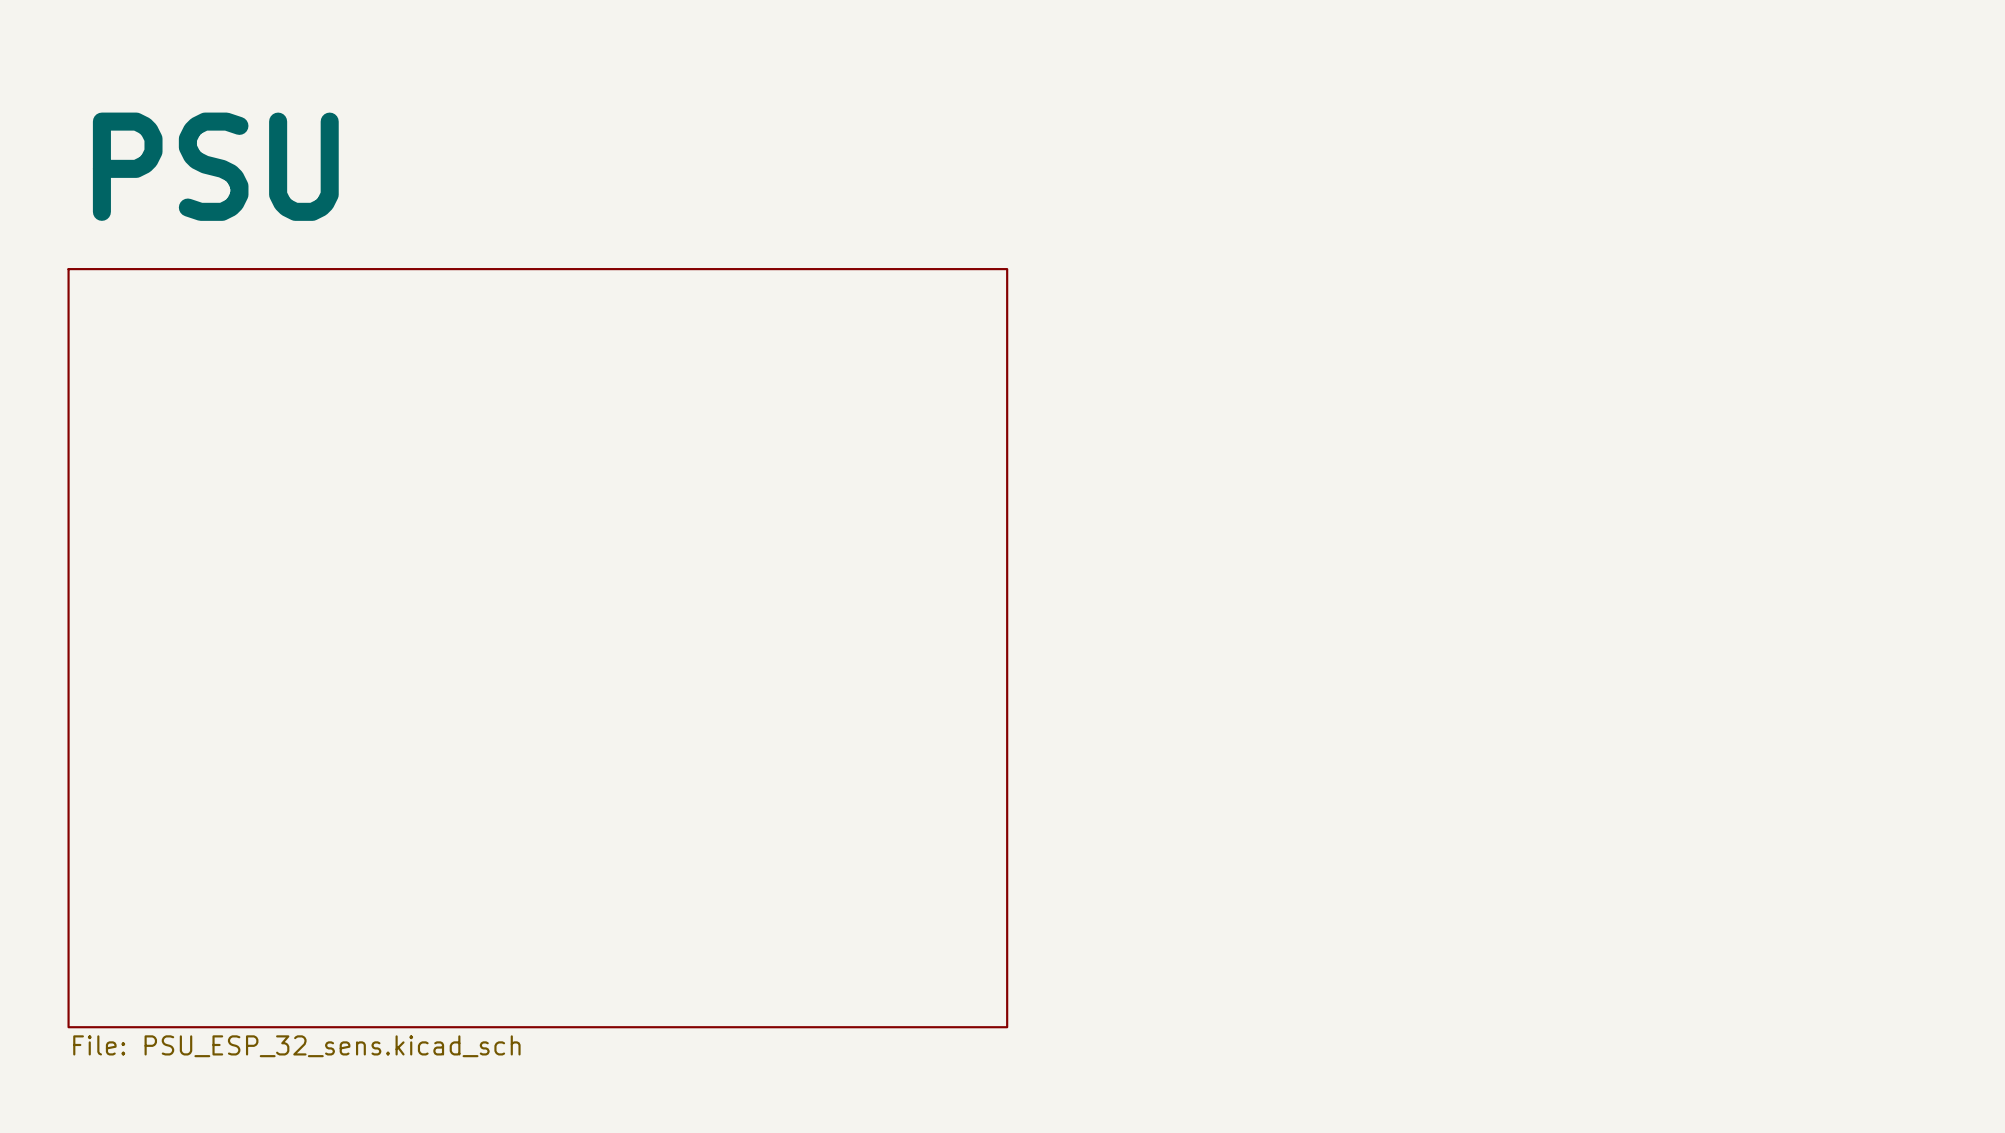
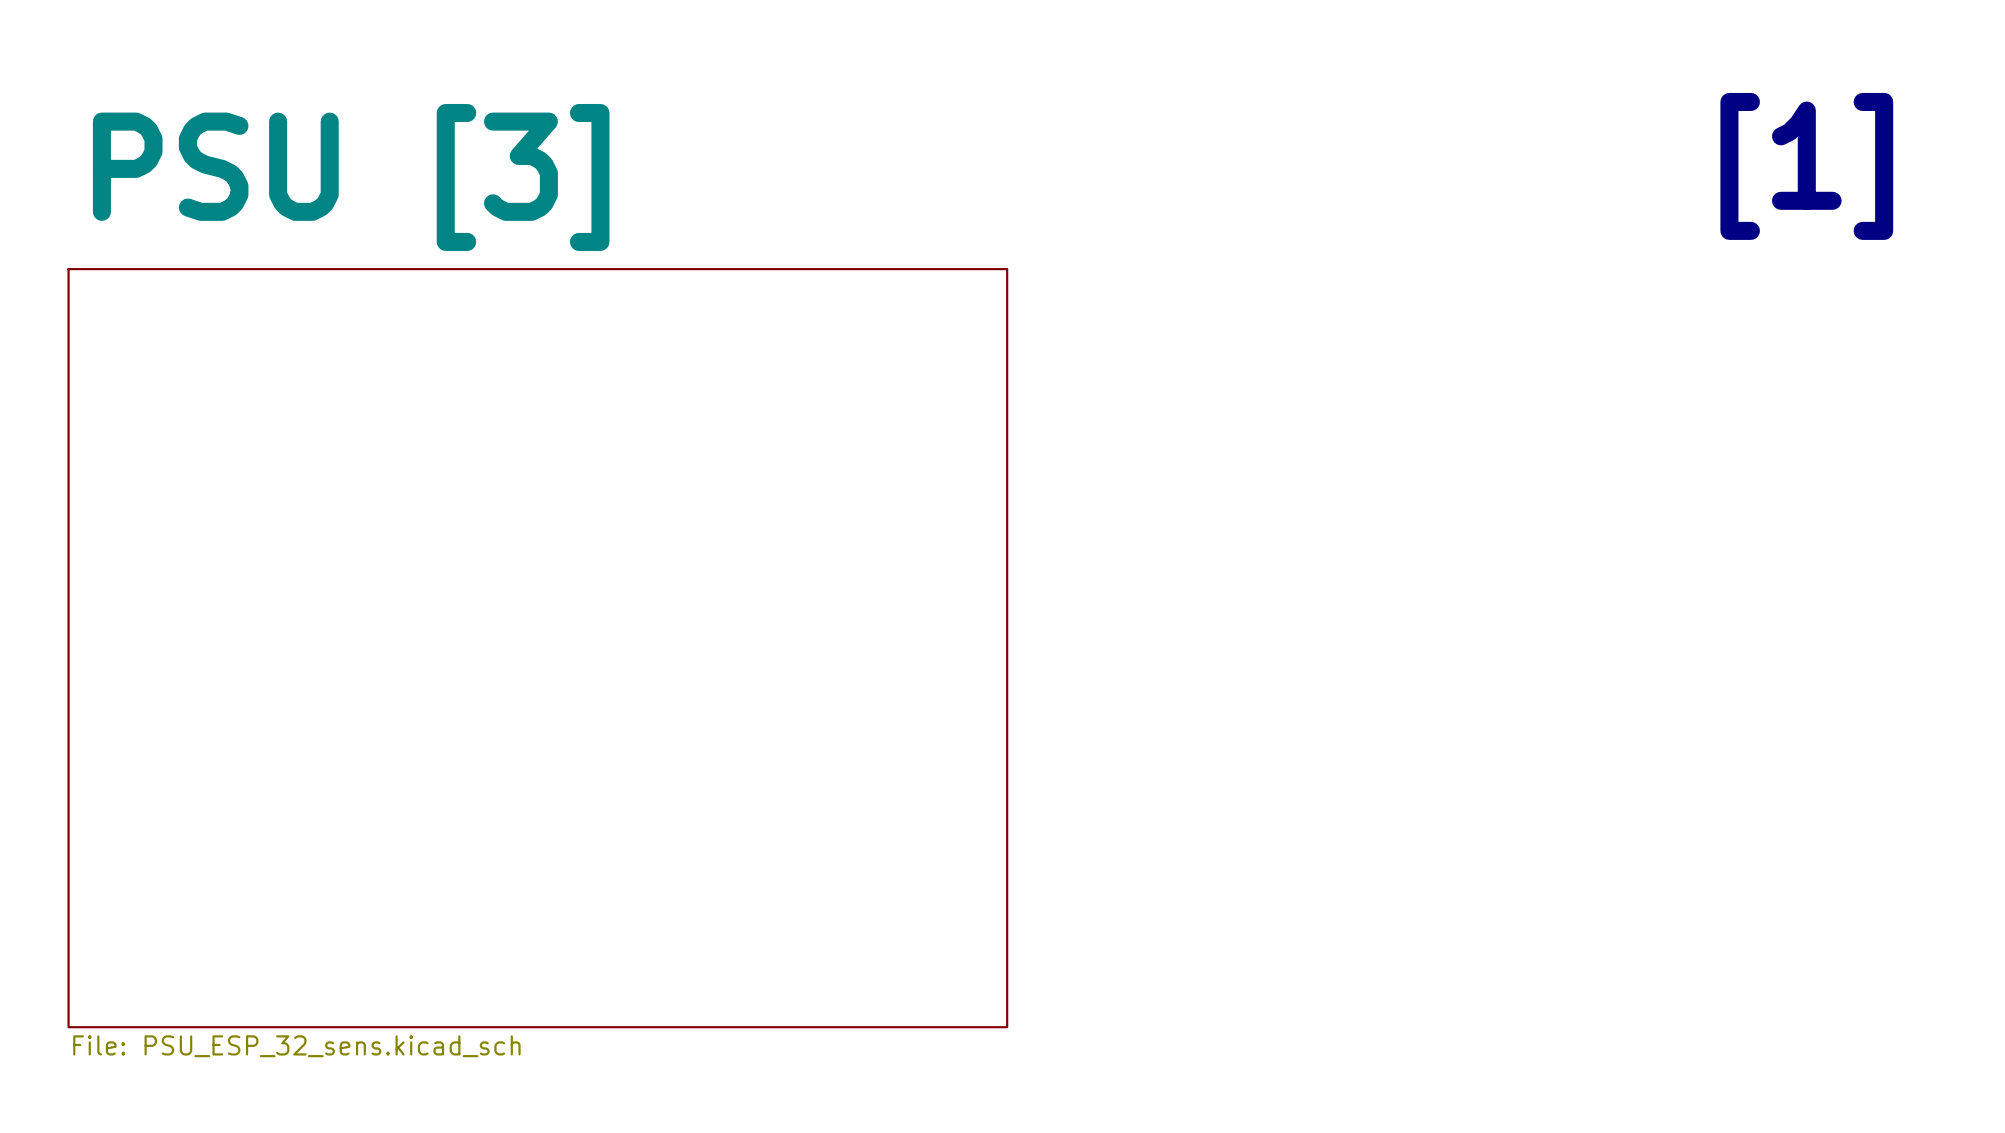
sheet PSU name: PSU (215, 166) -> PSU [3] (351, 177)
text: none -> [1] (1806, 166)

